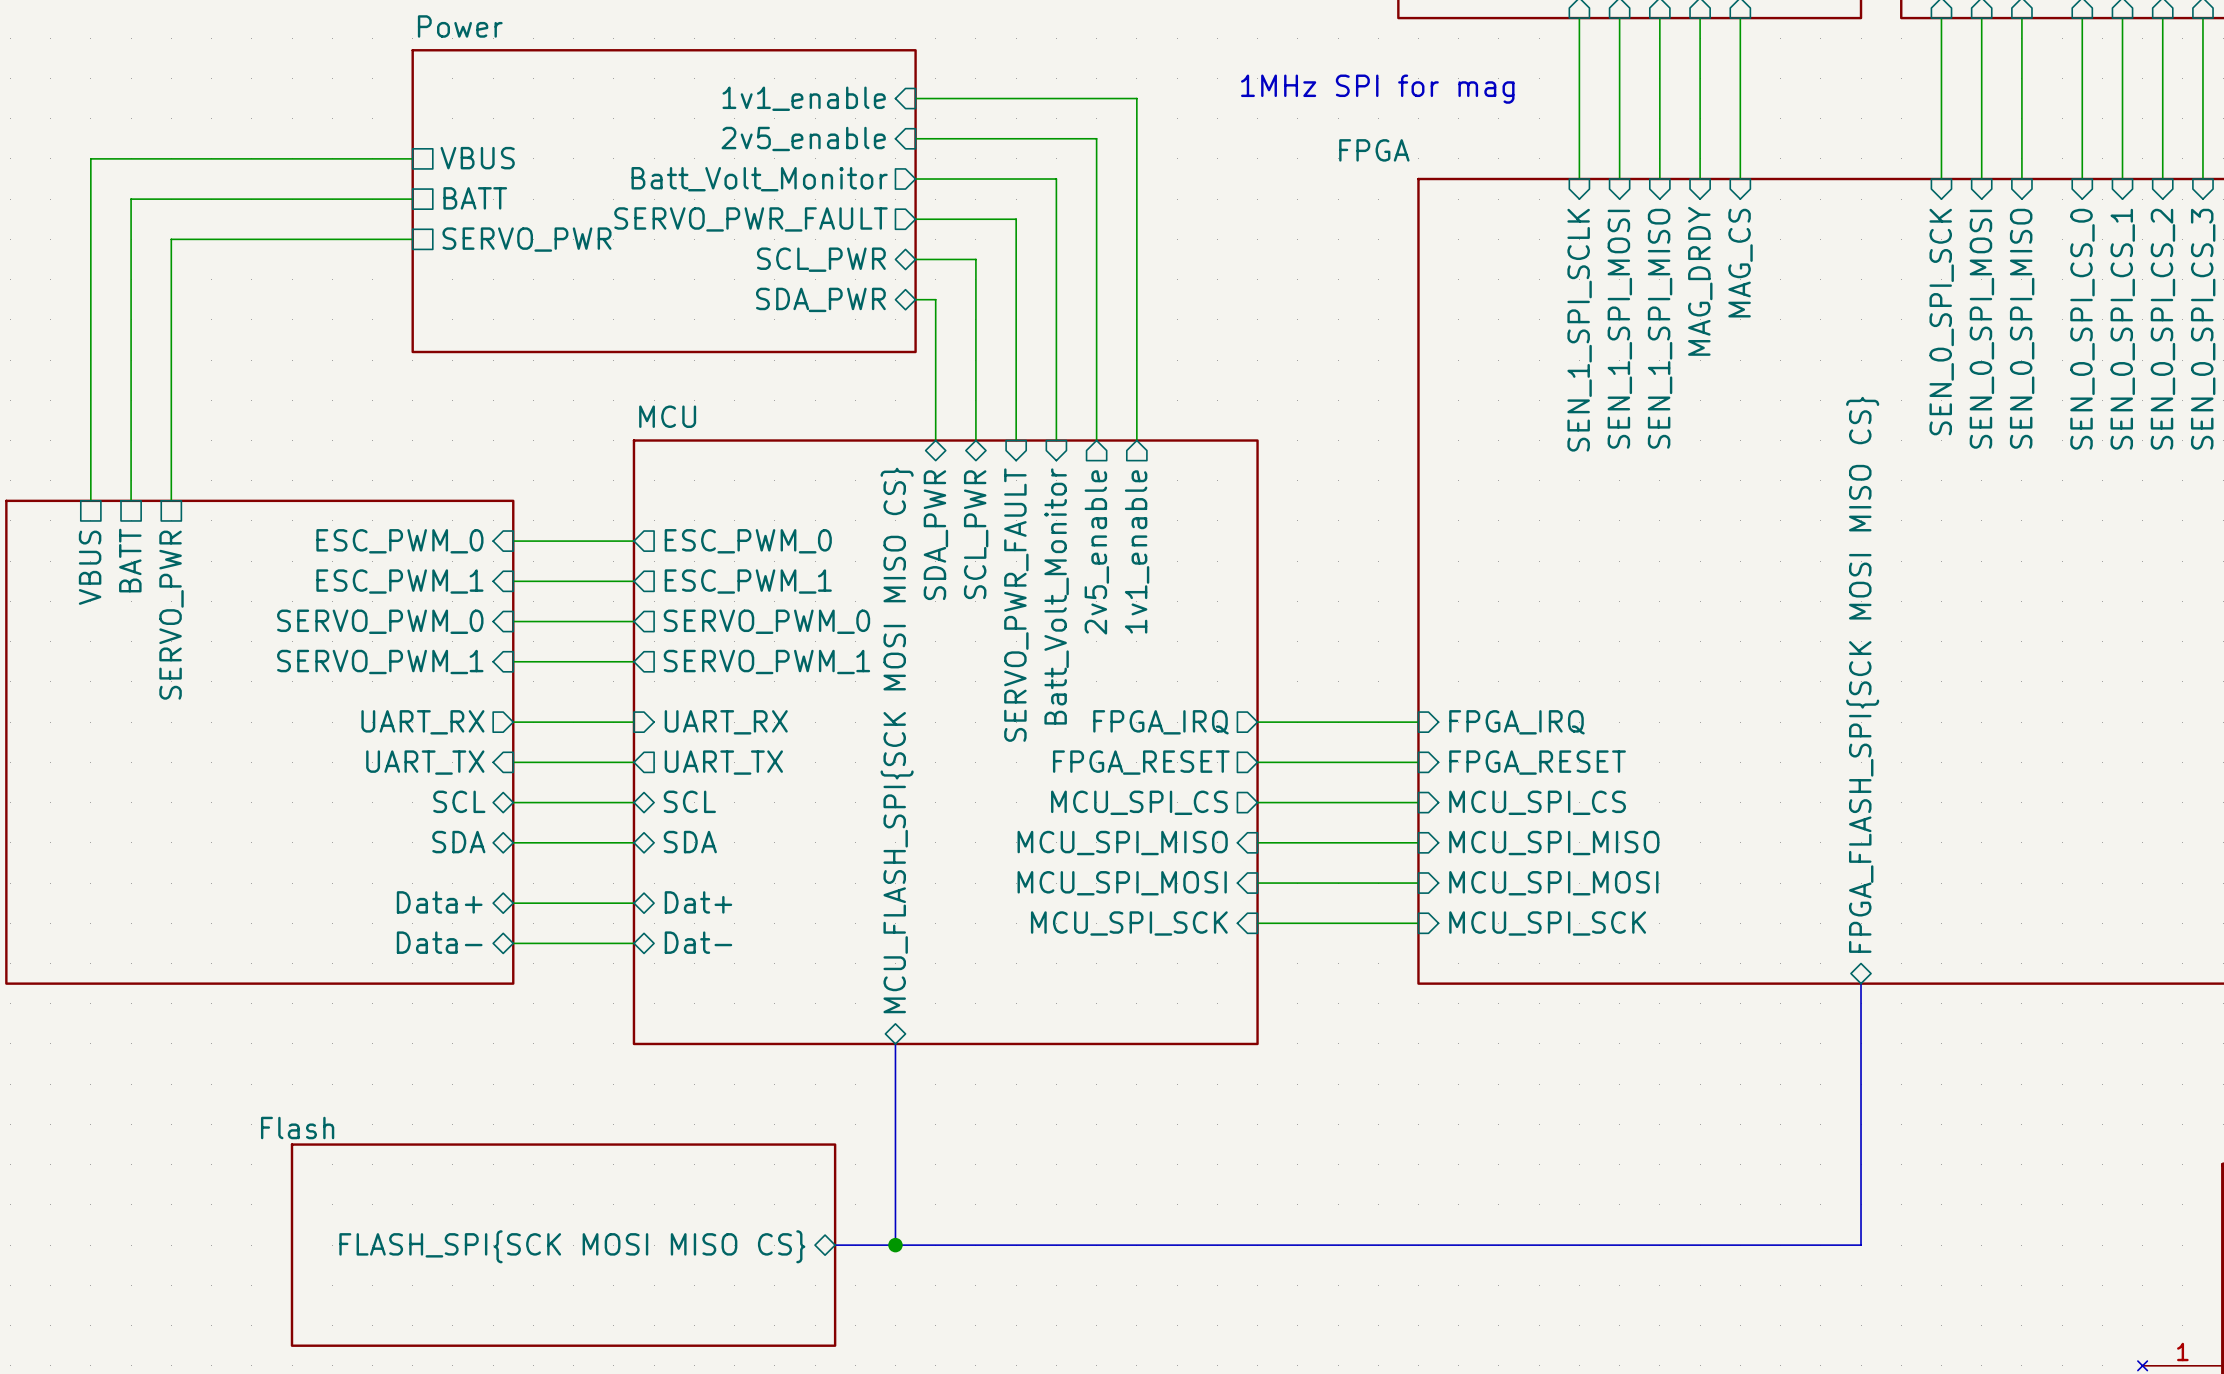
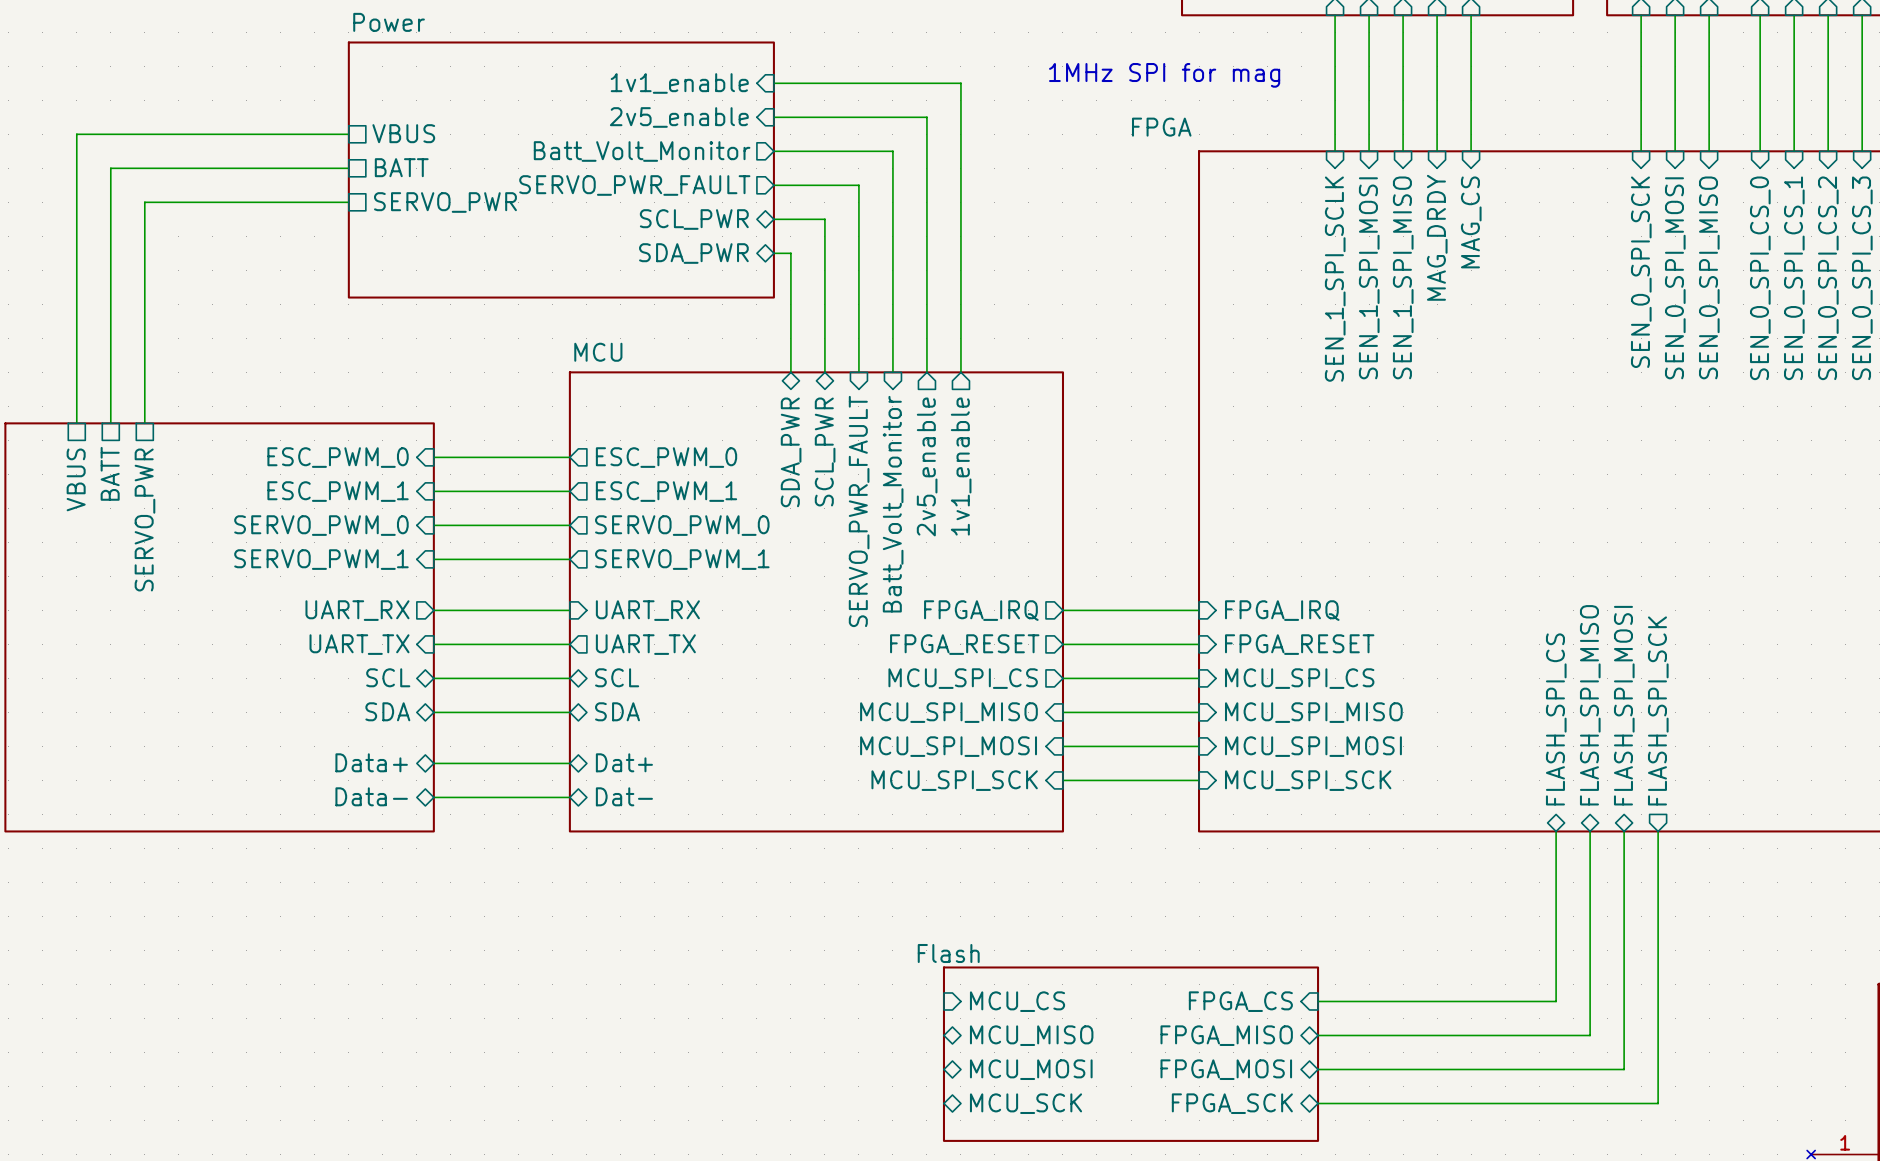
wire: none -> (535, 457) (569, 457)
sheet pin position: ESC_PWM_0 (748, 541) -> ESC_PWM_0 (666, 457)
wire: none -> (535, 491) (569, 491)
sheet pin position: ESC_PWM_1 (748, 581) -> ESC_PWM_1 (666, 491)
wire: none -> (535, 525) (569, 525)
sheet pin position: SERVO_PWM_0 (766, 621) -> SERVO_PWM_0 (682, 525)
wire: none -> (535, 559) (569, 559)
sheet pin position: SERVO_PWM_1 (766, 661) -> SERVO_PWM_1 (682, 559)
sheet pin: FPGA_FLASH_SPI{SCK MOSI MISO CS} (1862, 674) -> none
sheet MCU: none -> (816, 601)
wire: none -> (535, 610) (569, 610)
sheet pin position: UART_RX (726, 722) -> UART_RX (647, 610)
sheet pin: MCU_FLASH_SPI{SCK MOSI MISO CS} (897, 740) -> none
sheet MCU: (945, 742) -> none
wire: none -> (535, 644) (569, 644)
sheet pin position: UART_TX (723, 762) -> UART_TX (645, 644)
sheet pin position: SCL (689, 801) -> SCL (617, 677)
wire: none -> (535, 678) (569, 678)
sheet pin: none -> FLASH_SPI_MISO (1590, 705)
sheet pin: none -> FLASH_SPI_MOSI (1624, 705)
sheet pin: none -> FLASH_SPI_SCK (1658, 710)
wire: none -> (535, 712) (569, 712)
sheet pin position: SDA (690, 842) -> SDA (617, 711)
sheet pin: none -> FLASH_SPI_CS (1556, 719)
sheet pin position: Dat+ (698, 902) -> Dat+ (624, 762)
wire: none -> (535, 763) (569, 763)
sheet pin position: Dat- (698, 942) -> Dat- (624, 796)
wire: none -> (535, 797) (569, 797)
wire: none -> (1556, 831) (1556, 1001) (1318, 1001)
bus: (1861, 983) (1861, 1245) (835, 1245) -> none
wire: none -> (1590, 831) (1590, 1035) (1318, 1035)
wire: none -> (1624, 831) (1624, 1069) (1318, 1069)
wire: none -> (1658, 831) (1658, 1103) (1318, 1103)
bus: (895, 1043) (895, 1245) -> none
sheet pin: none -> MCU_CS (1017, 1001)
sheet pin: none -> FPGA_CS (1240, 1001)
sheet pin: none -> MCU_MISO (1031, 1035)
sheet pin: none -> FPGA_MISO (1226, 1035)
sheet Flash: (563, 1245) -> none
junction: (895, 1245) -> none
sheet pin: FLASH_SPI{SCK MOSI MISO CS} (572, 1246) -> none
sheet Flash: none -> (1131, 1054)
sheet pin: none -> MCU_MOSI (1031, 1069)
sheet pin: none -> FPGA_MOSI (1226, 1069)
sheet pin: none -> MCU_SCK (1026, 1103)
sheet pin: none -> FPGA_SCK (1232, 1103)

